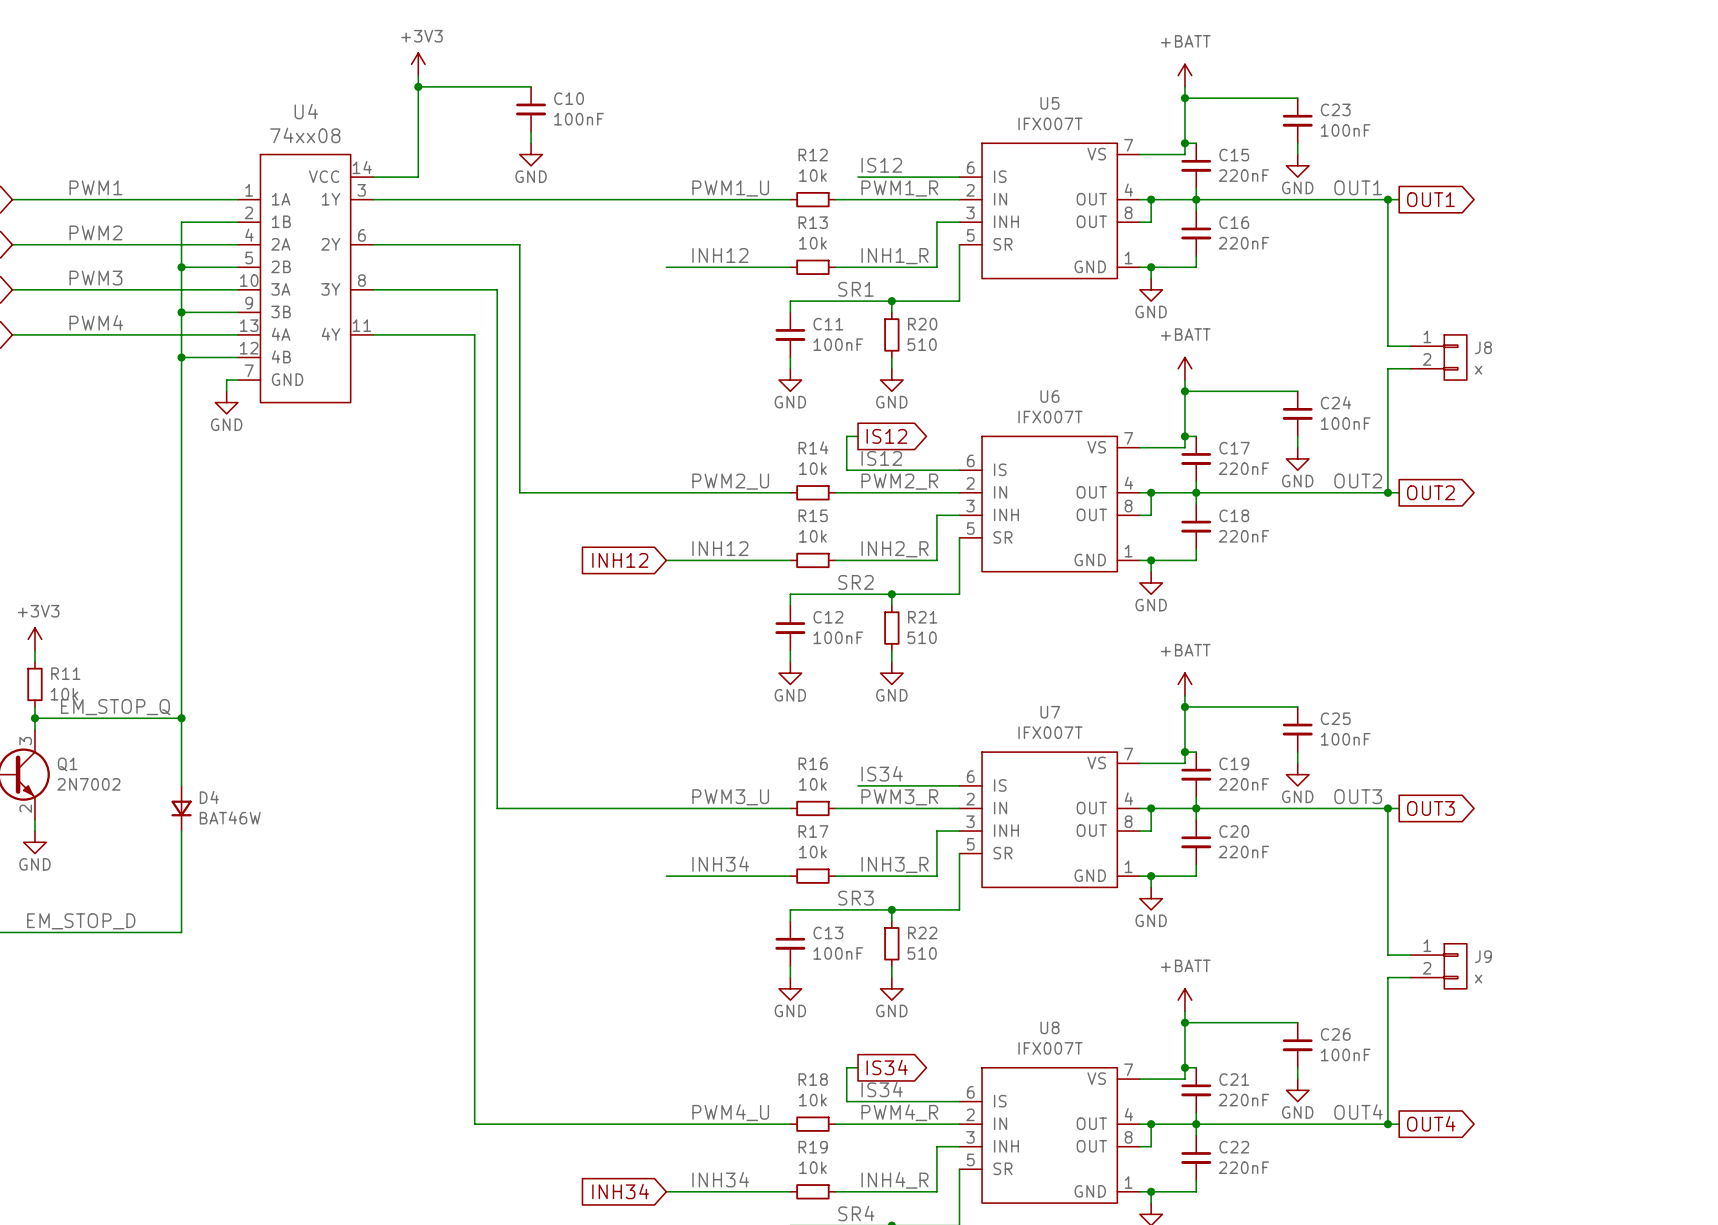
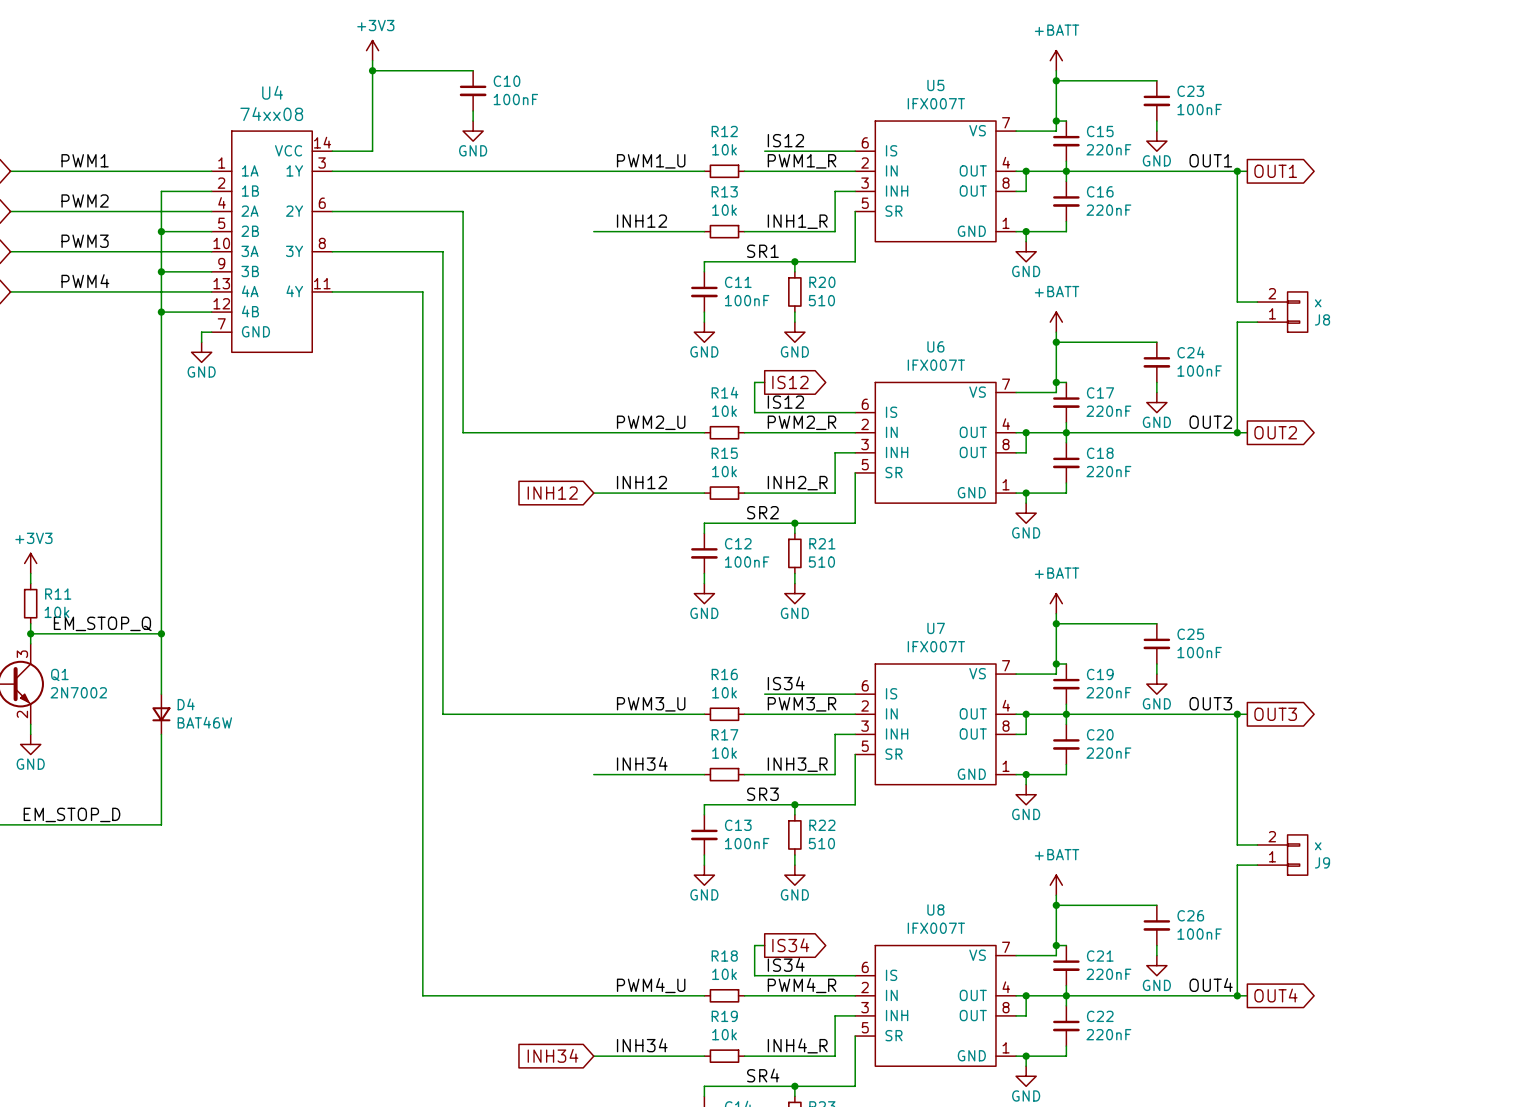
J8 flip: as is (1455, 357) -> up-down (1297, 312)
J9 flip: as is (1455, 966) -> up-down (1297, 855)

